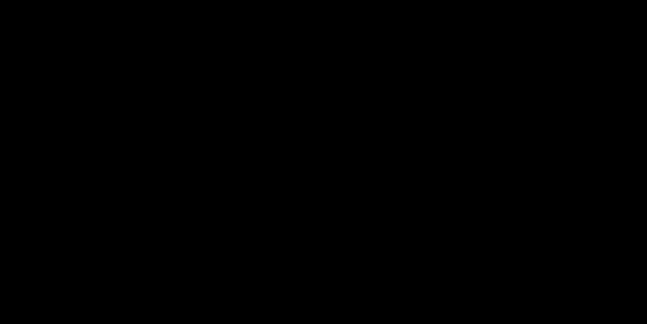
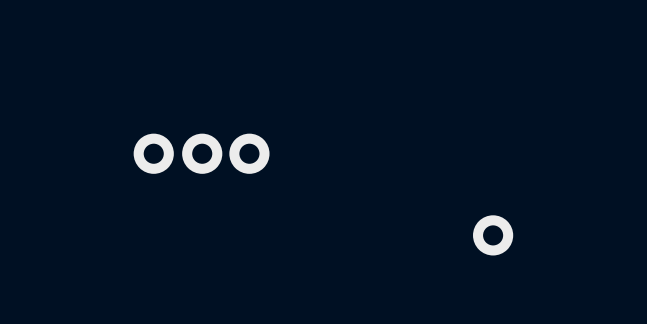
via: none -> (153, 153)
via: none -> (202, 153)
via: none -> (249, 153)
via: none -> (493, 235)

